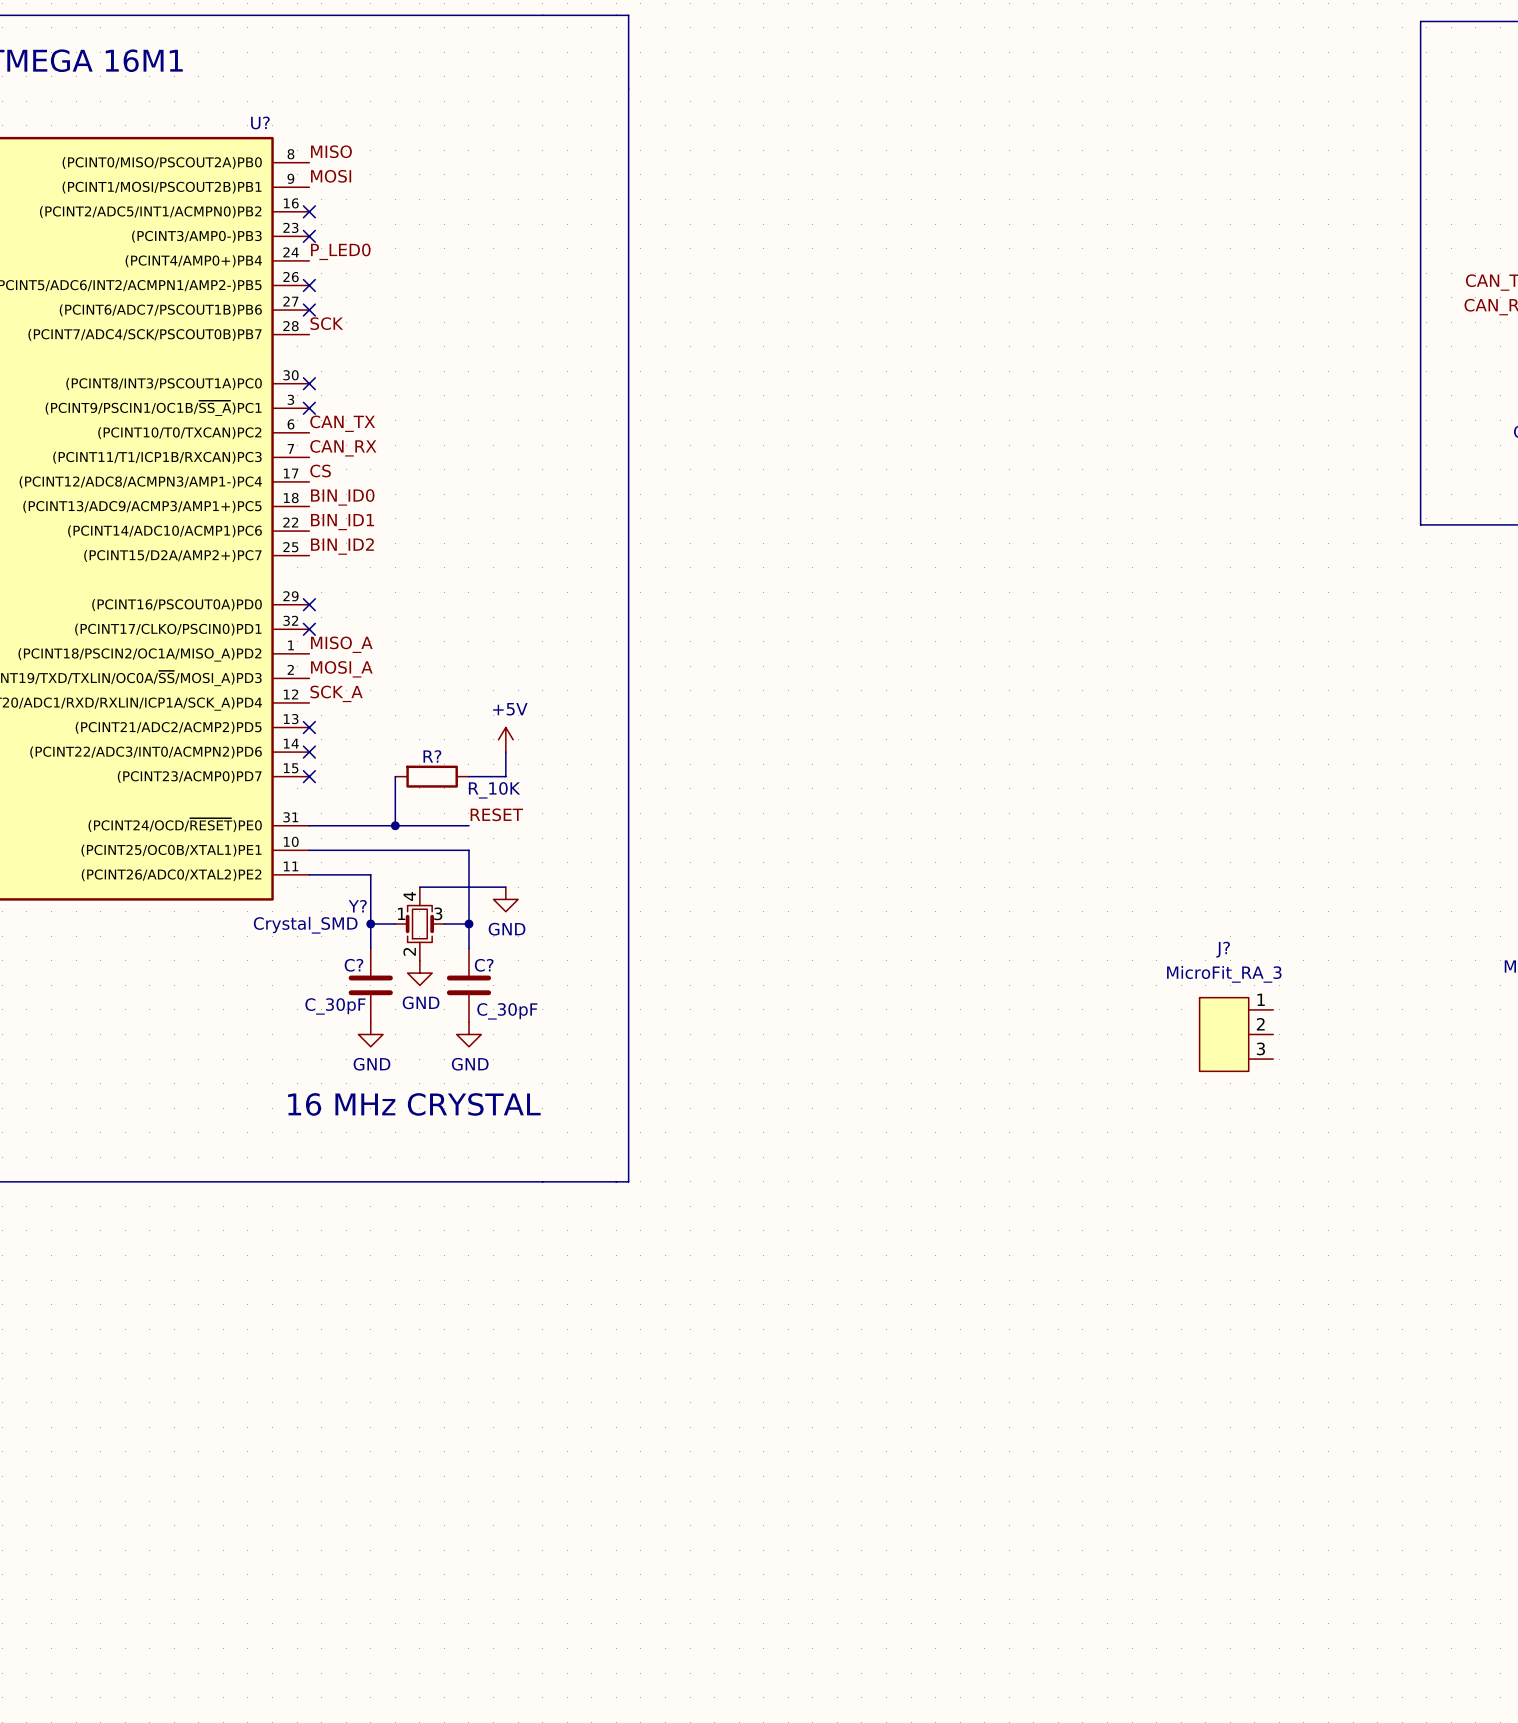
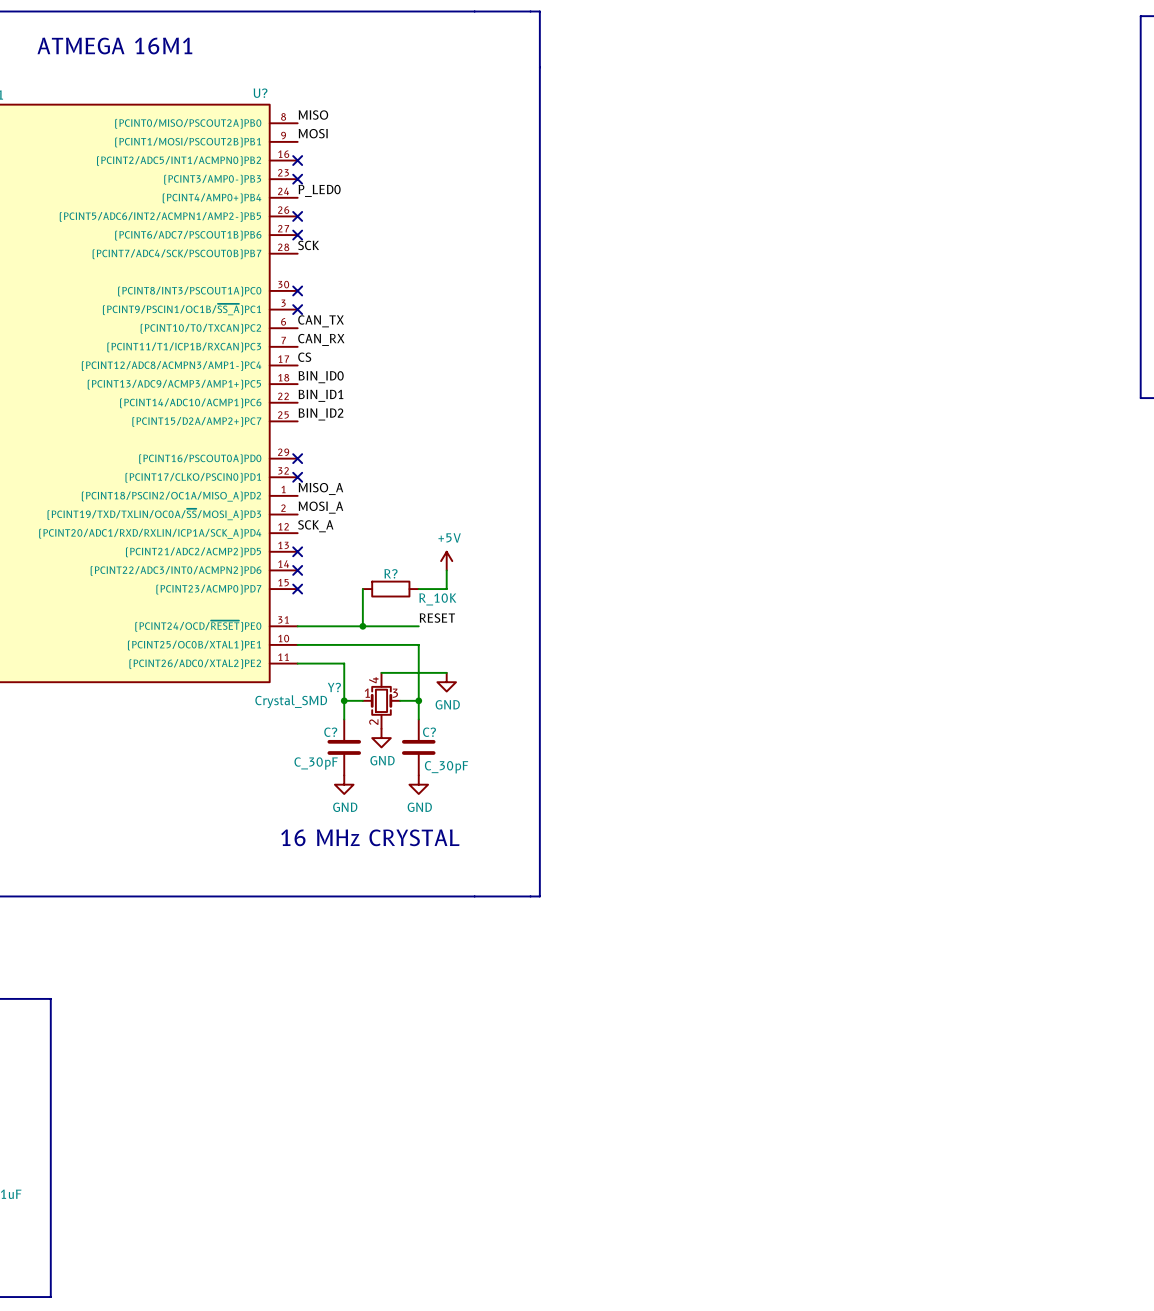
J?: MicroFit_RA_3 (1236, 1034) -> none

